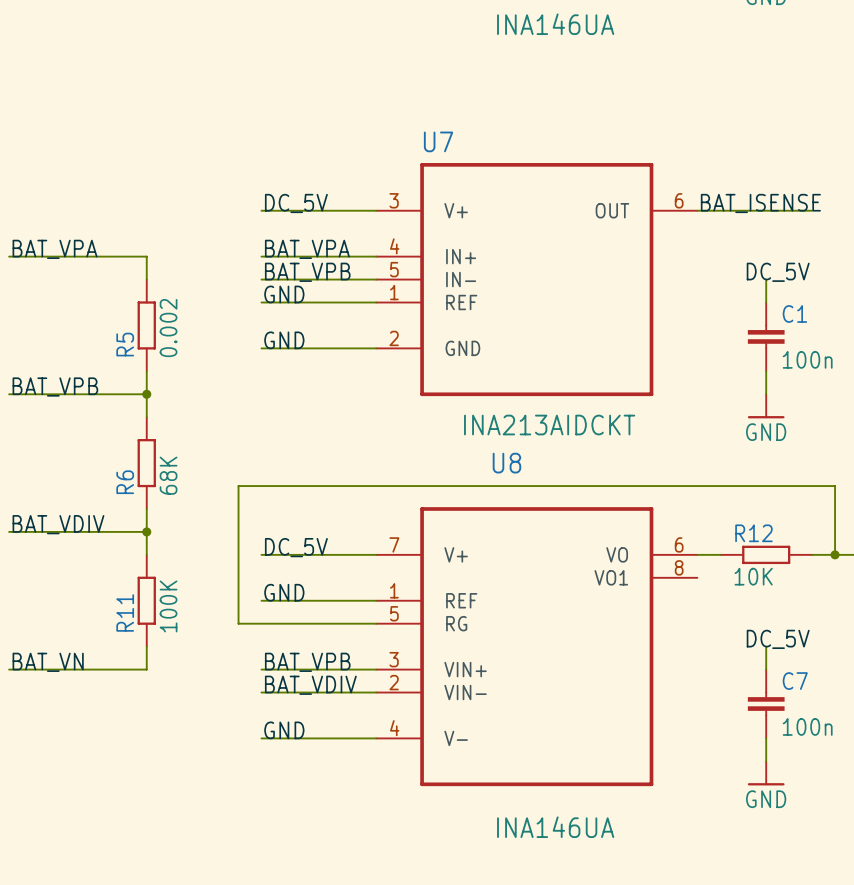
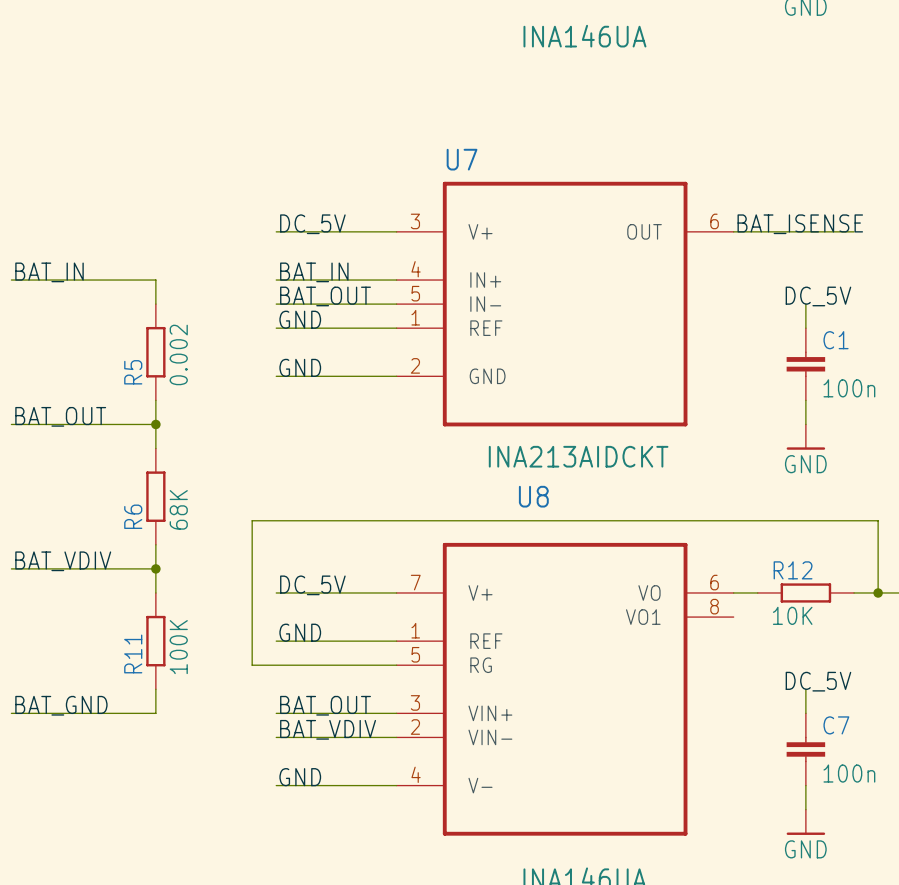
label: BAT_VPA (55, 249) -> BAT_IN (49, 272)
label: BAT_VPA (307, 249) -> BAT_IN (314, 272)
label: BAT_VPB (307, 272) -> BAT_OUT (325, 296)
label: BAT_VPB (55, 387) -> BAT_OUT (60, 416)
label: BAT_VN (48, 662) -> BAT_GND (61, 705)
label: BAT_VPB (307, 662) -> BAT_OUT (325, 705)

